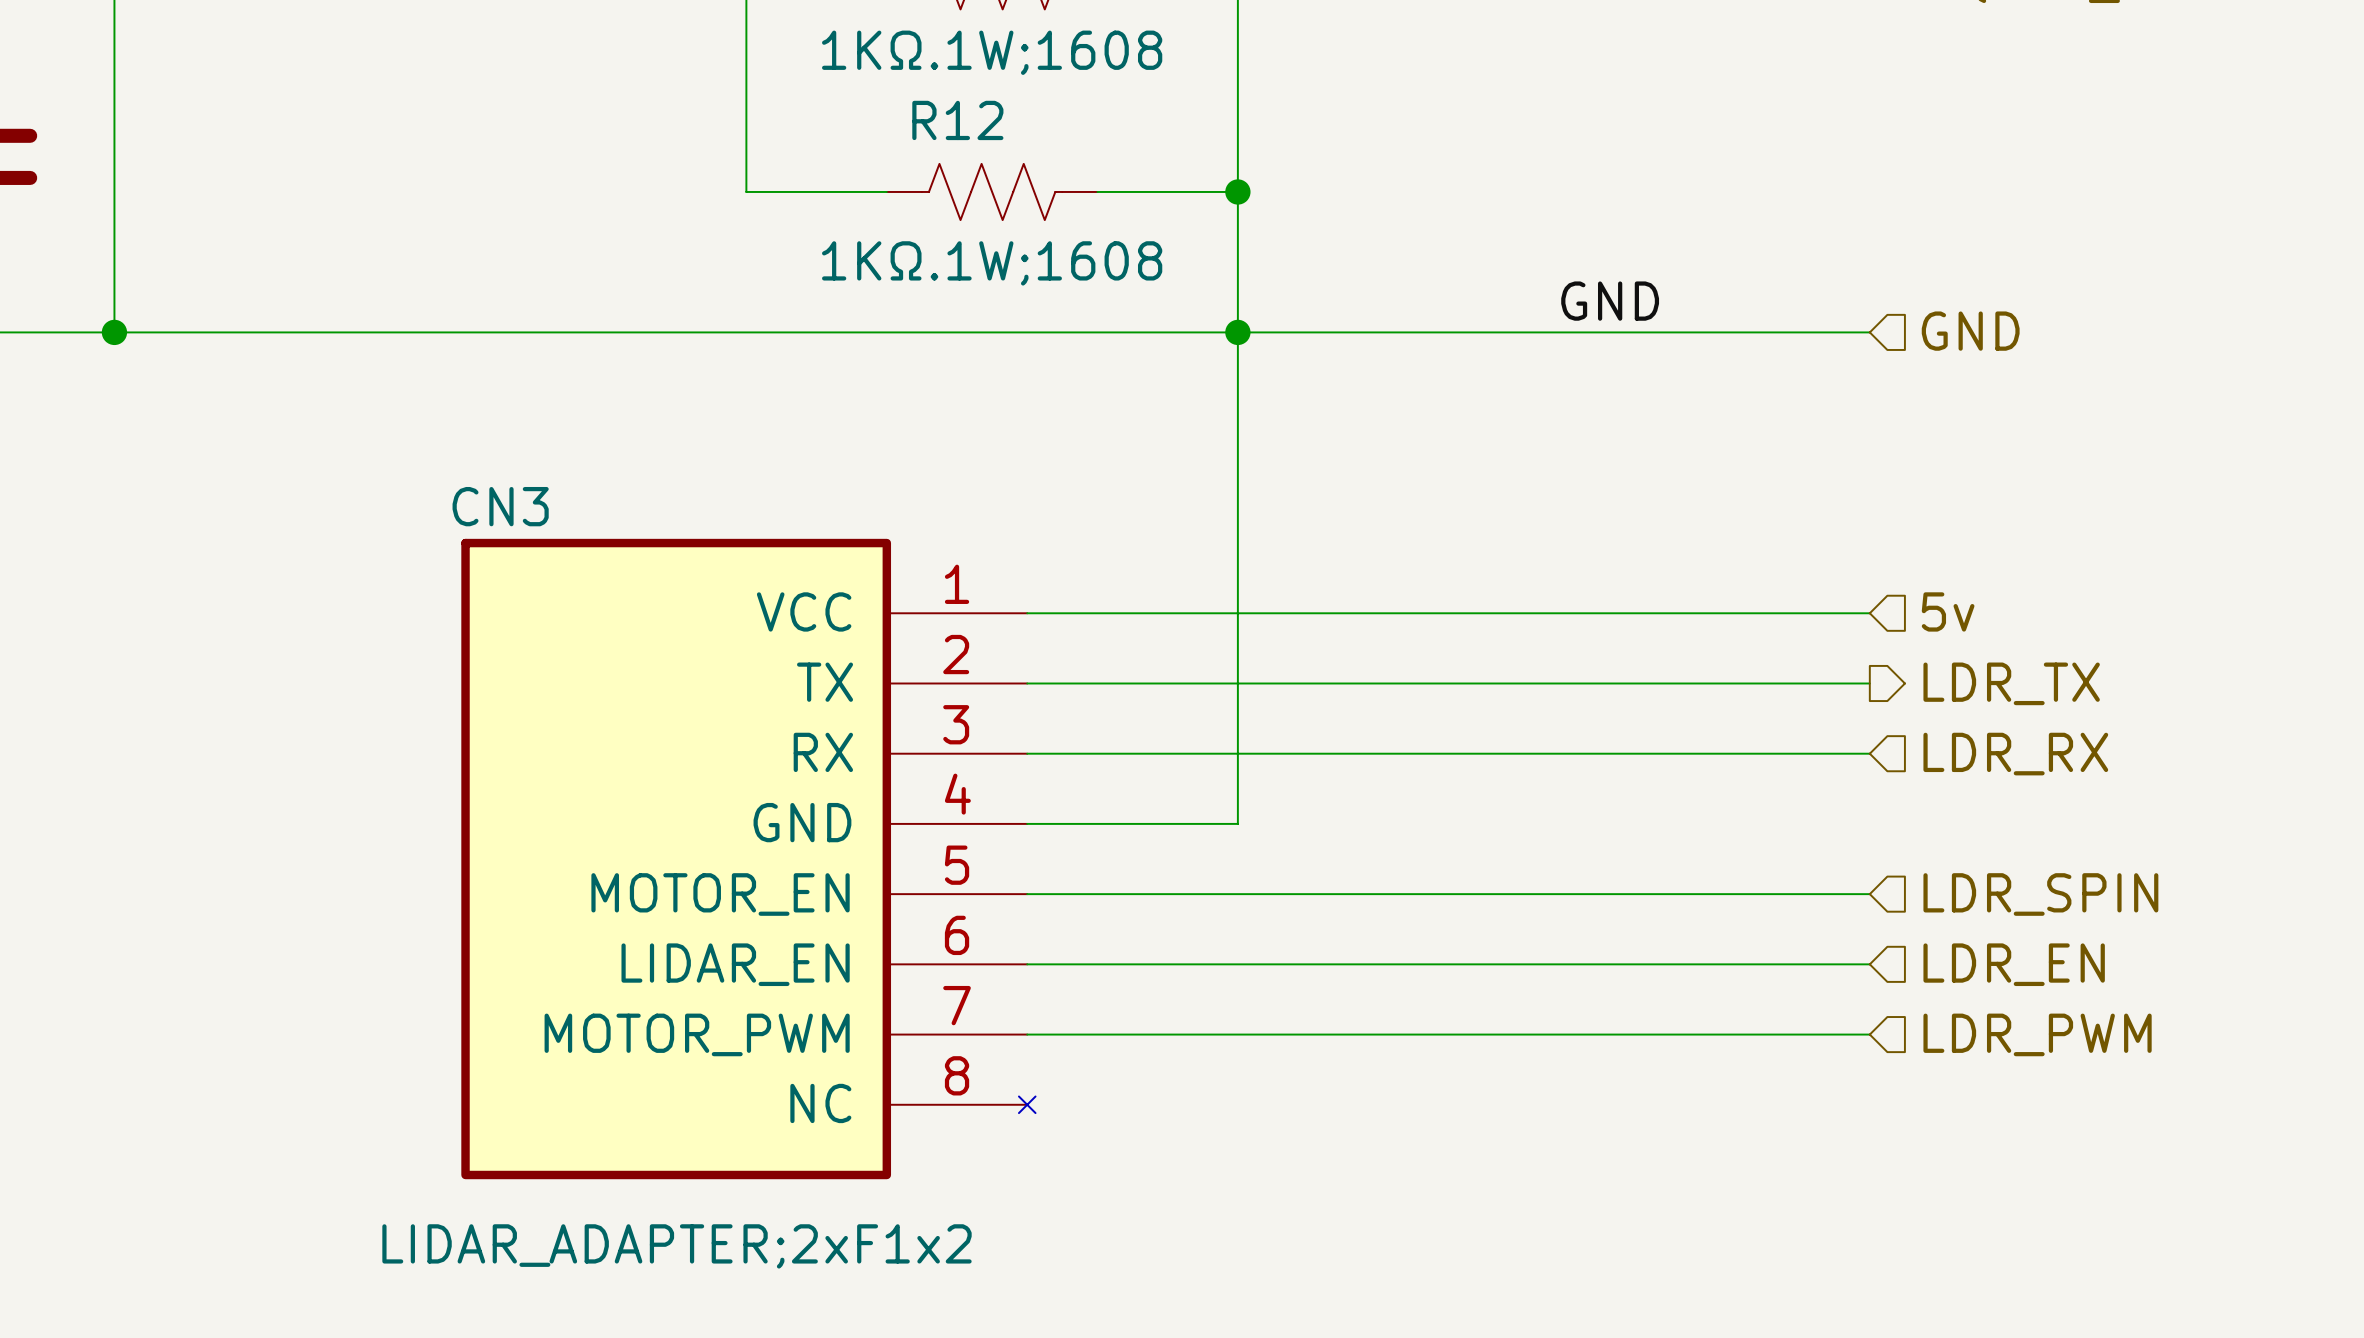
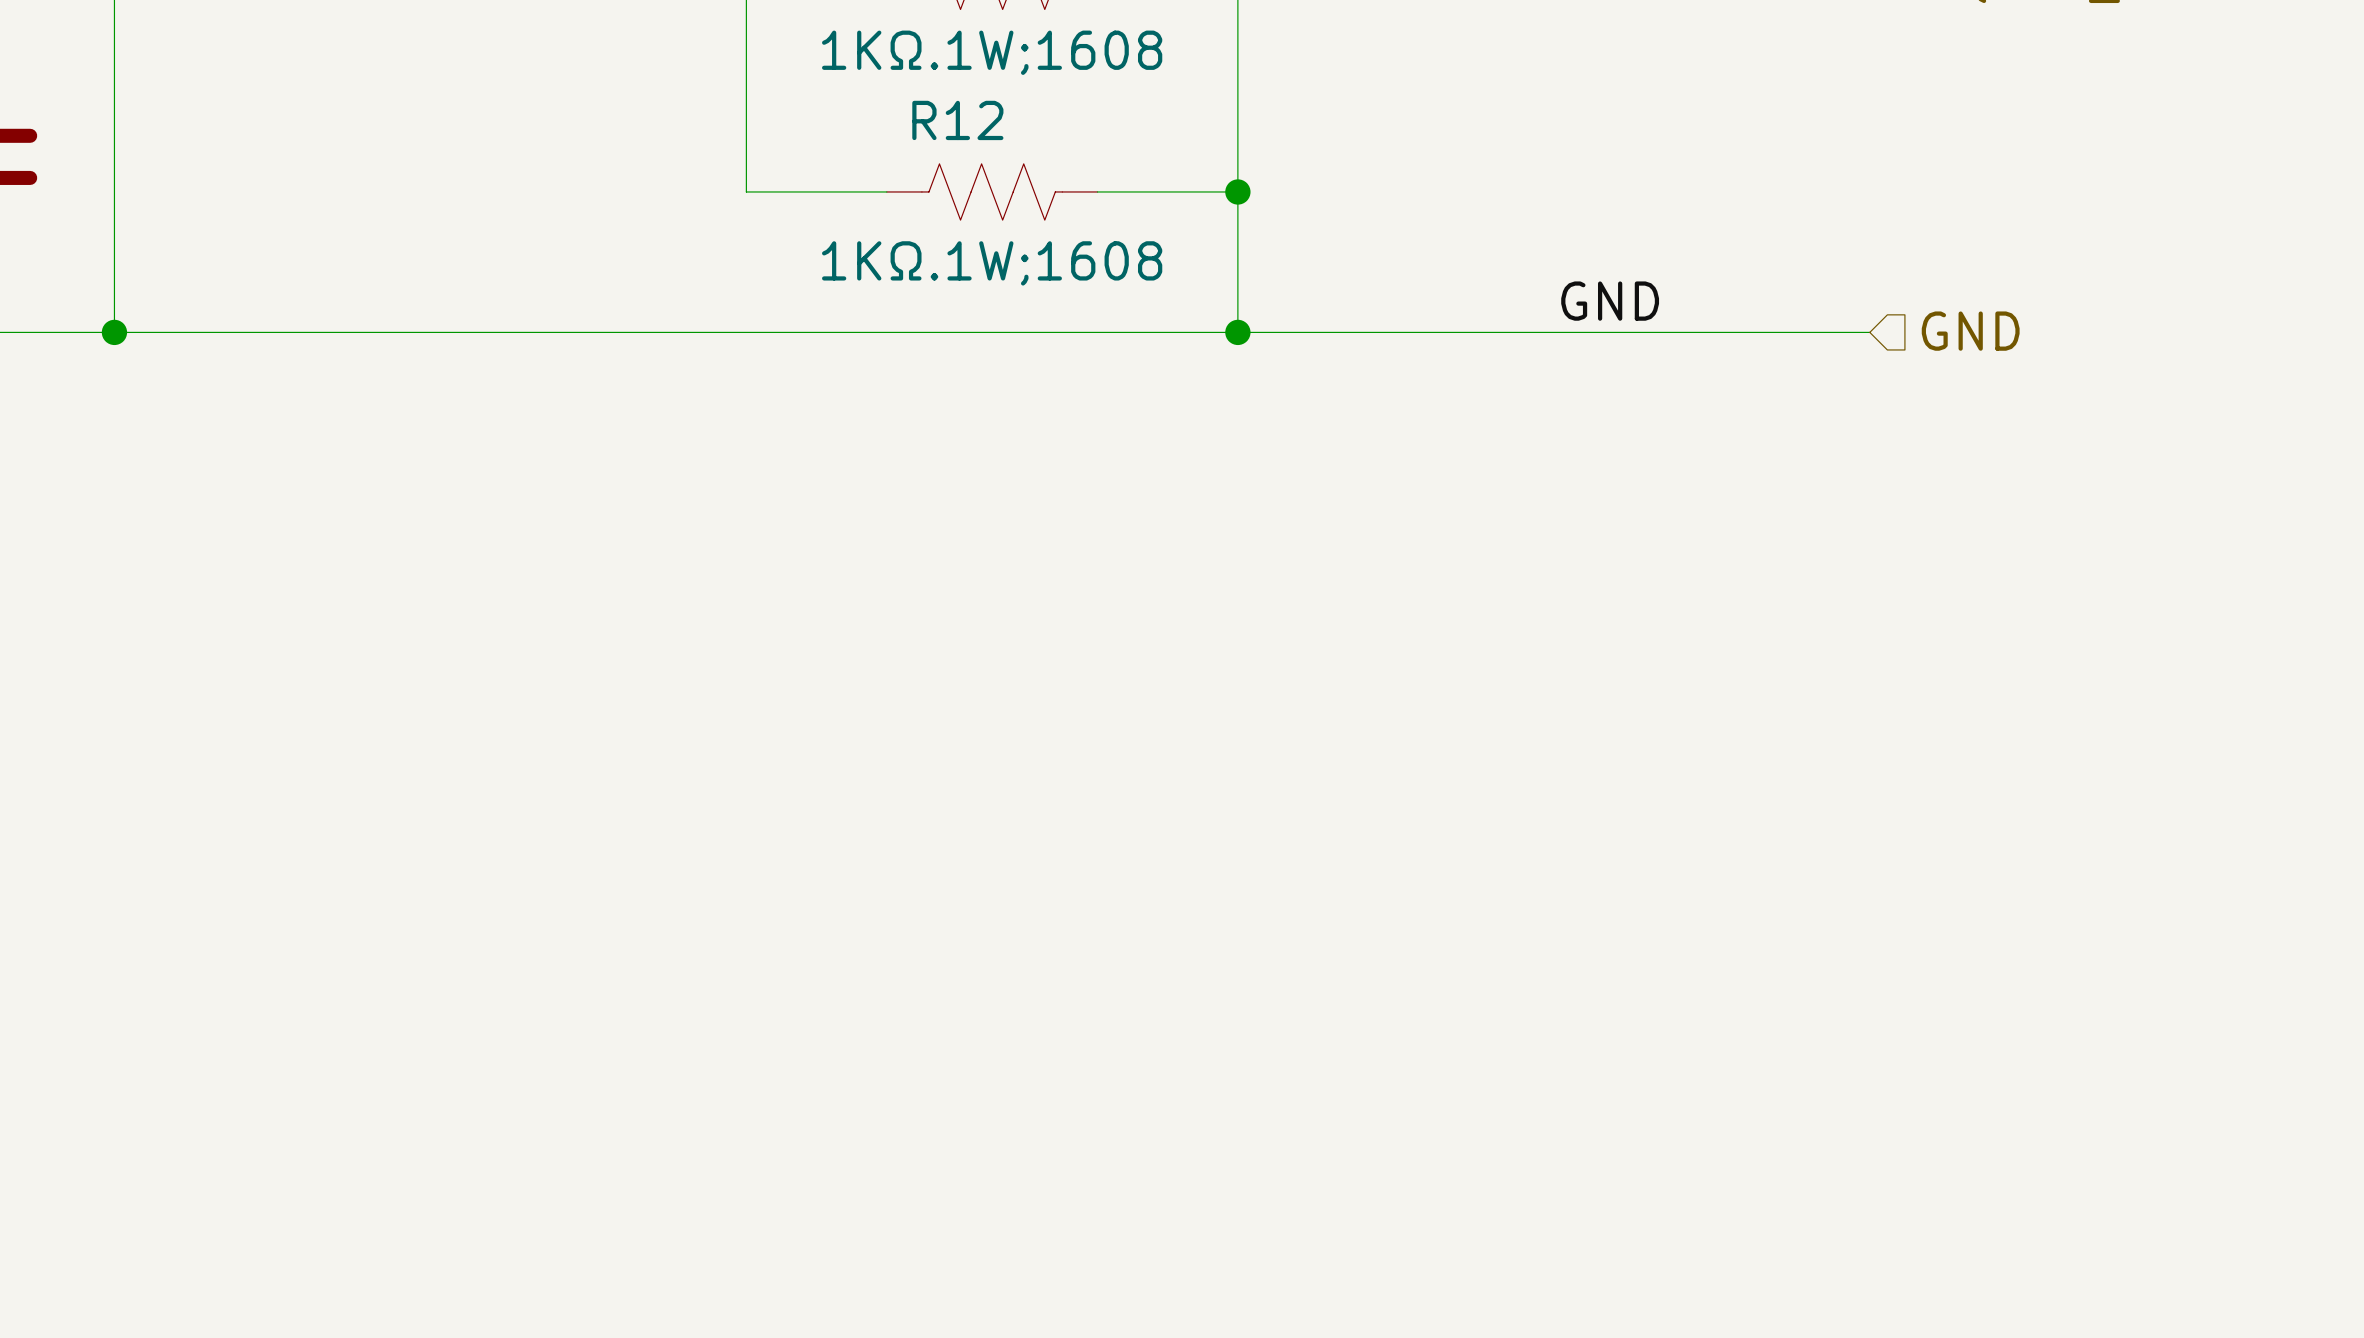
wire: (1237, 332) (1237, 823) (1027, 823) -> none
hierarchical label: 5v (1948, 611) -> none
wire: (1027, 613) (1869, 613) -> none
wire: (1027, 683) (1869, 683) -> none
hierarchical label: LDR_TX (2011, 683) -> none
wire: (1027, 753) (1869, 753) -> none
hierarchical label: LDR_RX (2015, 754) -> none
CN3: LIDAR_ADAPTER;2xF1x2 (748, 859) -> none
wire: (1027, 894) (1869, 894) -> none
hierarchical label: LDR_SPIN (2040, 894) -> none
wire: (1027, 964) (1869, 964) -> none
hierarchical label: LDR_EN (2014, 964) -> none
wire: (1027, 1034) (1869, 1034) -> none
hierarchical label: LDR_PWM (2037, 1034) -> none

